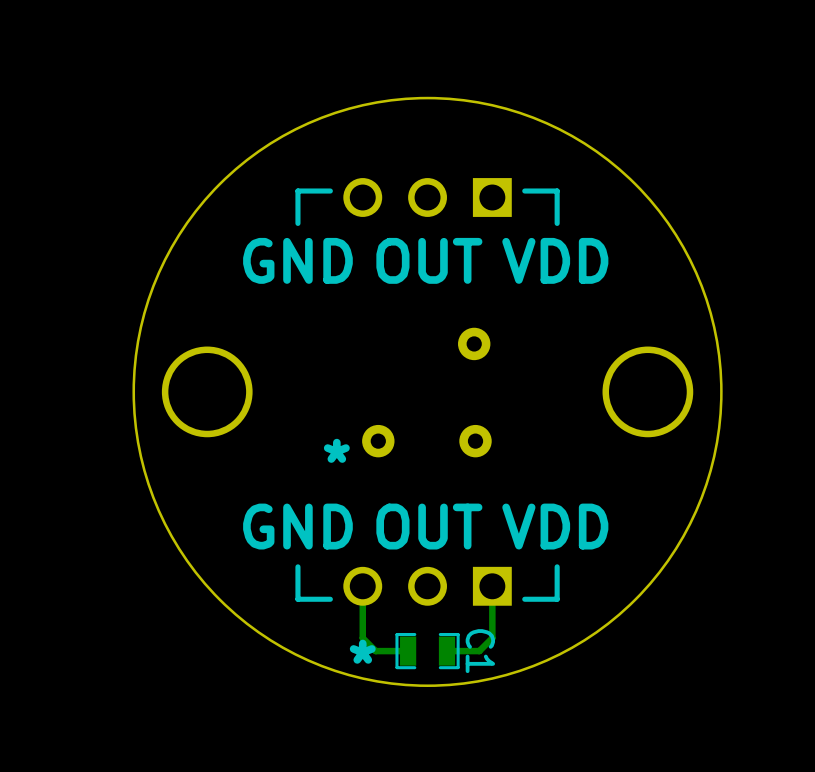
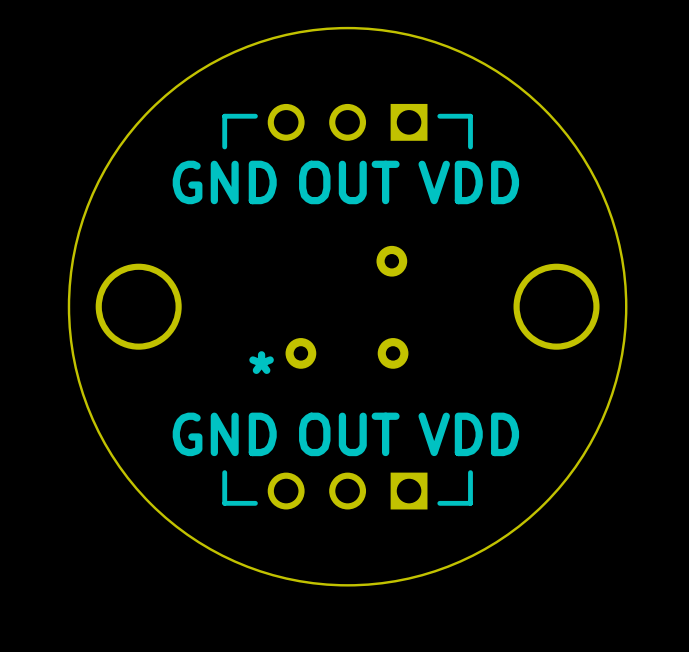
track: (362, 586) (362, 638) (375, 651) (408, 651) -> none
track: (492, 586) (492, 638) (479, 651) (446, 651) -> none
text: * (362, 651) -> none
C1: (427, 651) -> none

